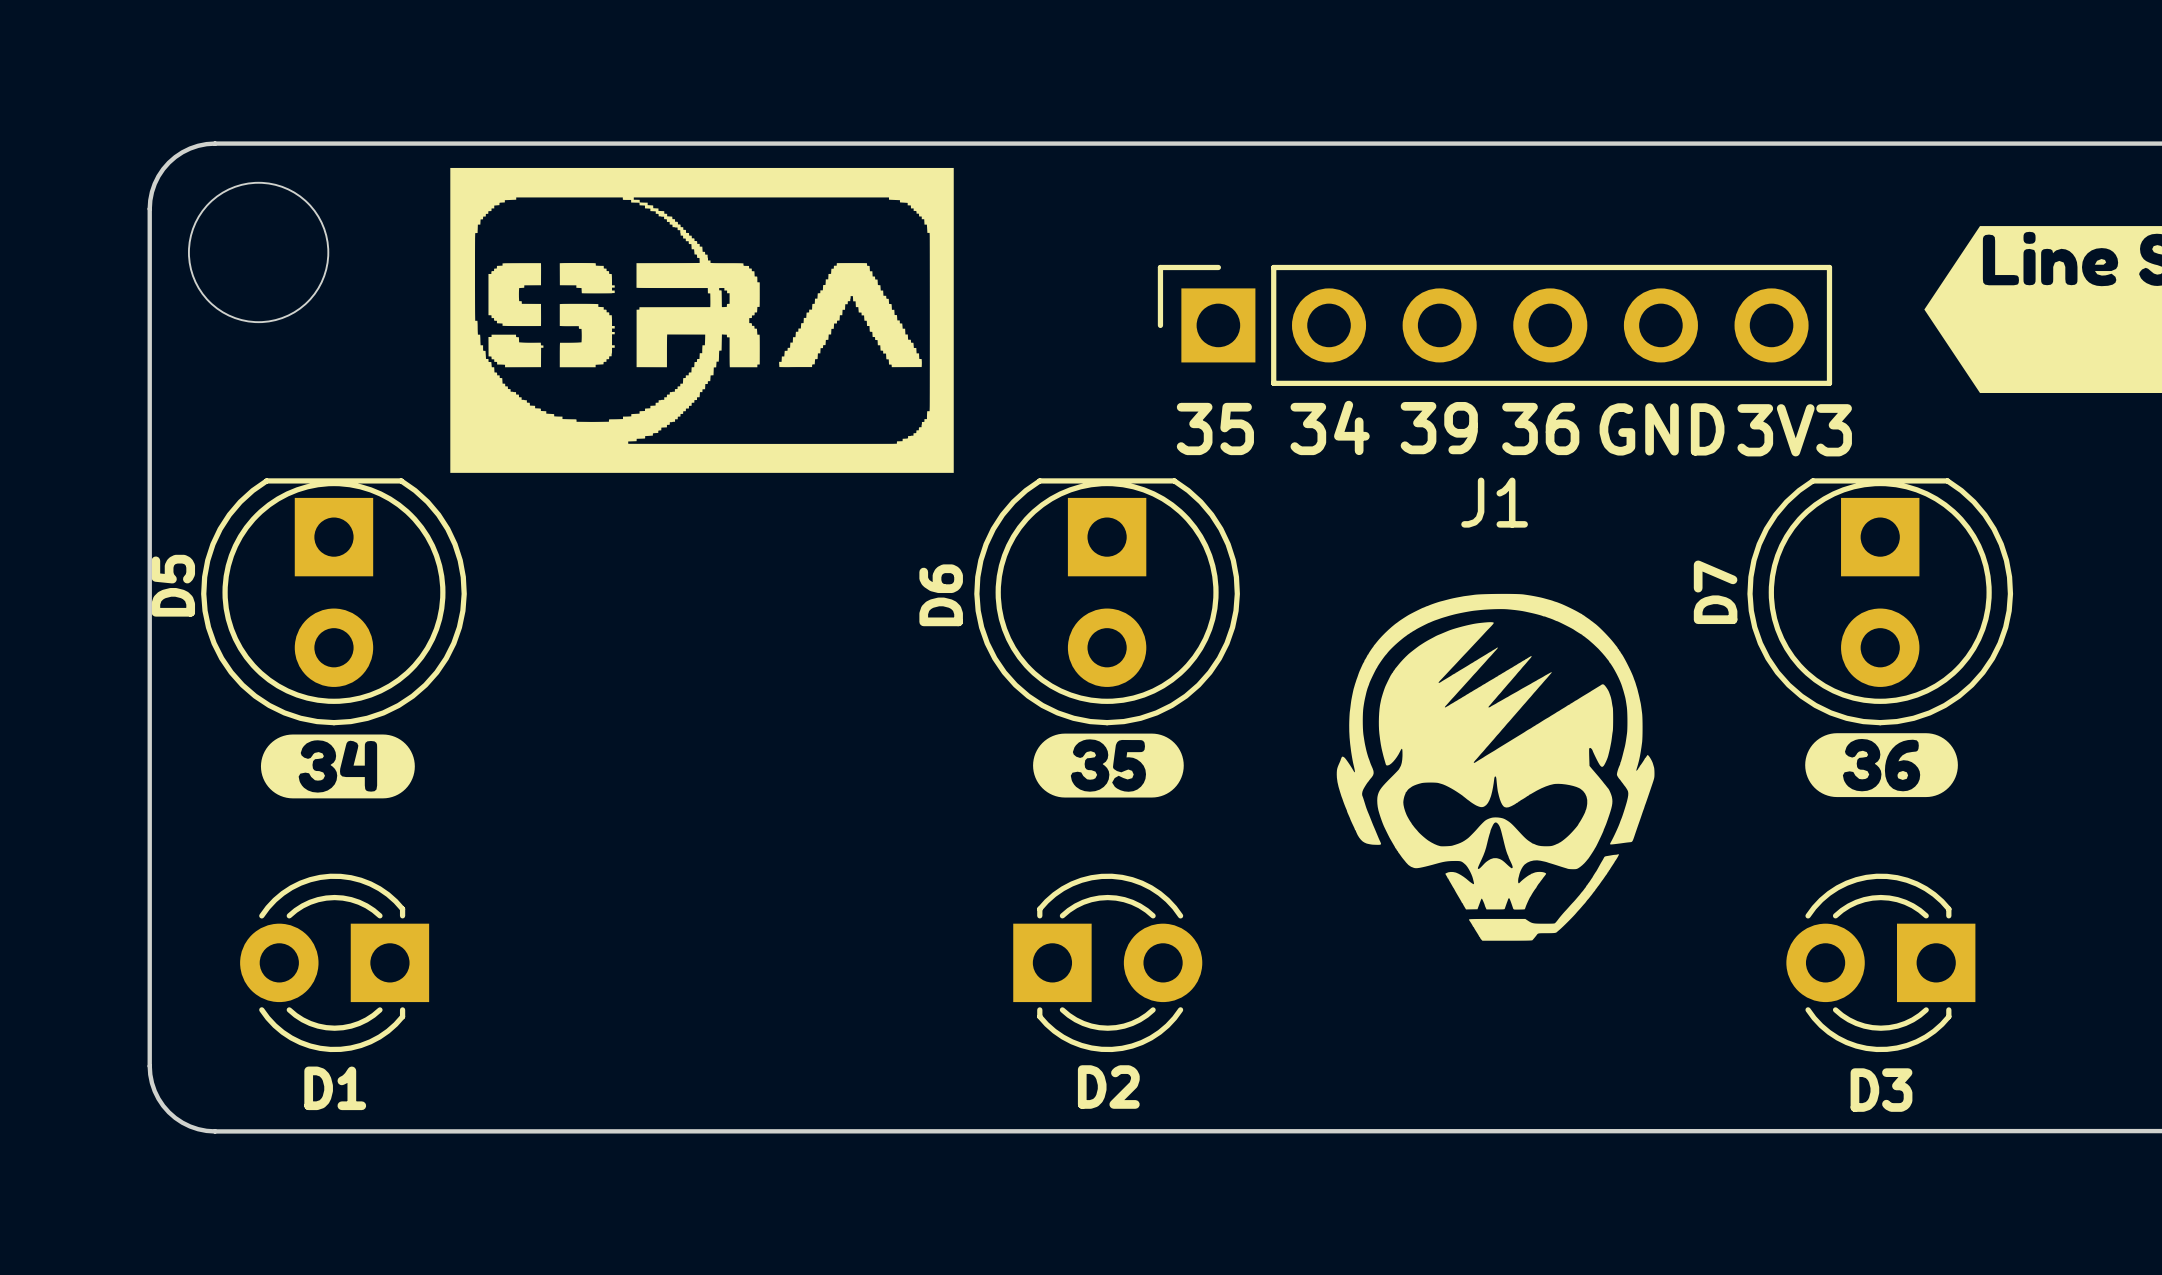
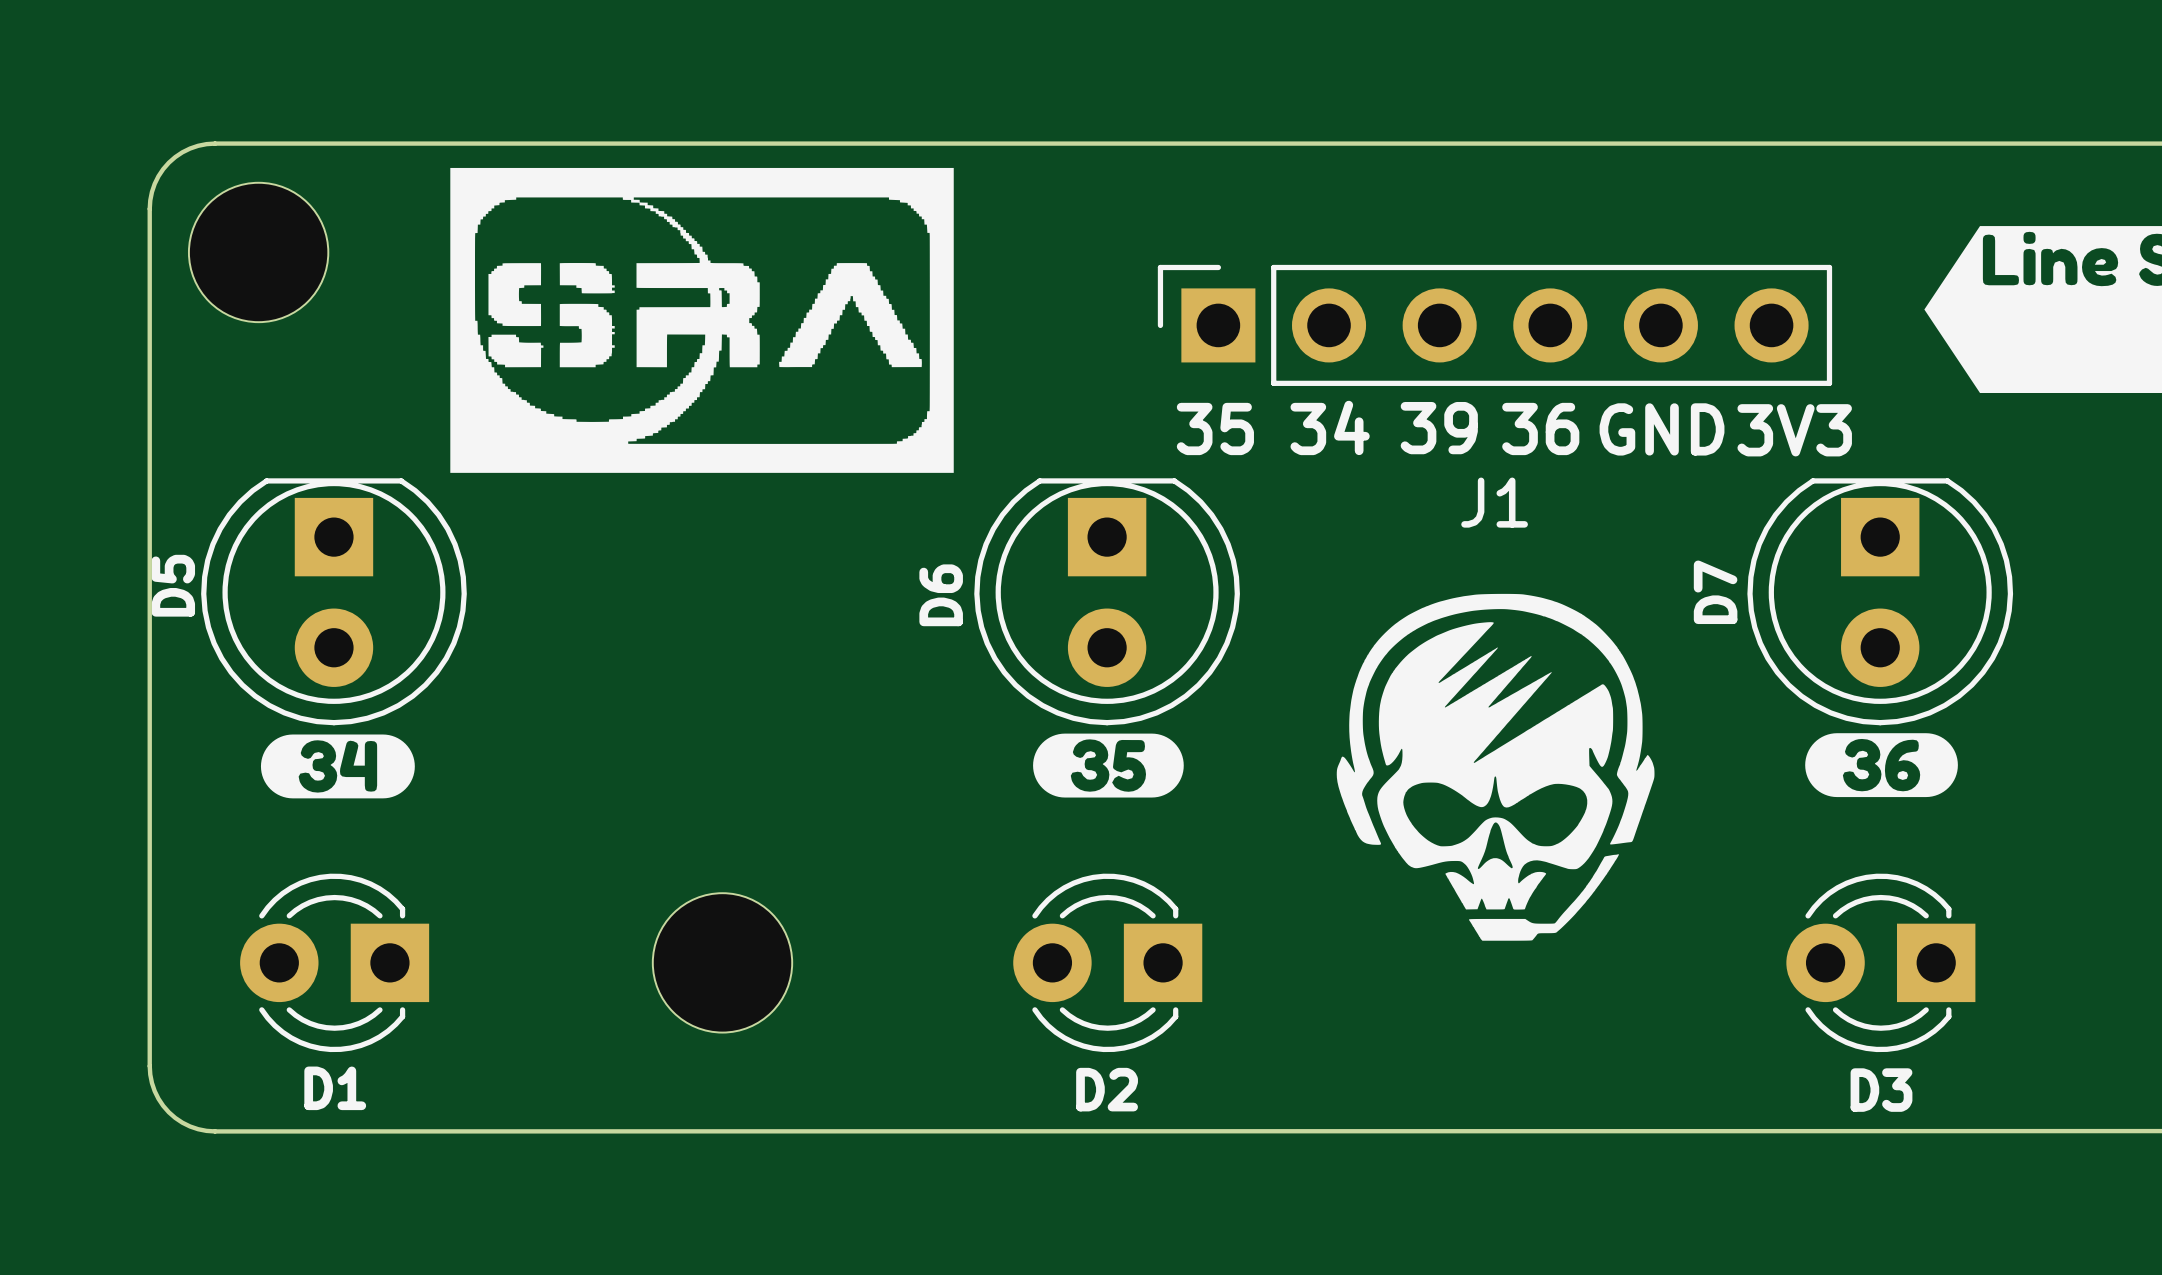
part: none -> (722, 962)
D2 rotation: 0° (1107, 962) -> 180° (1107, 962)

